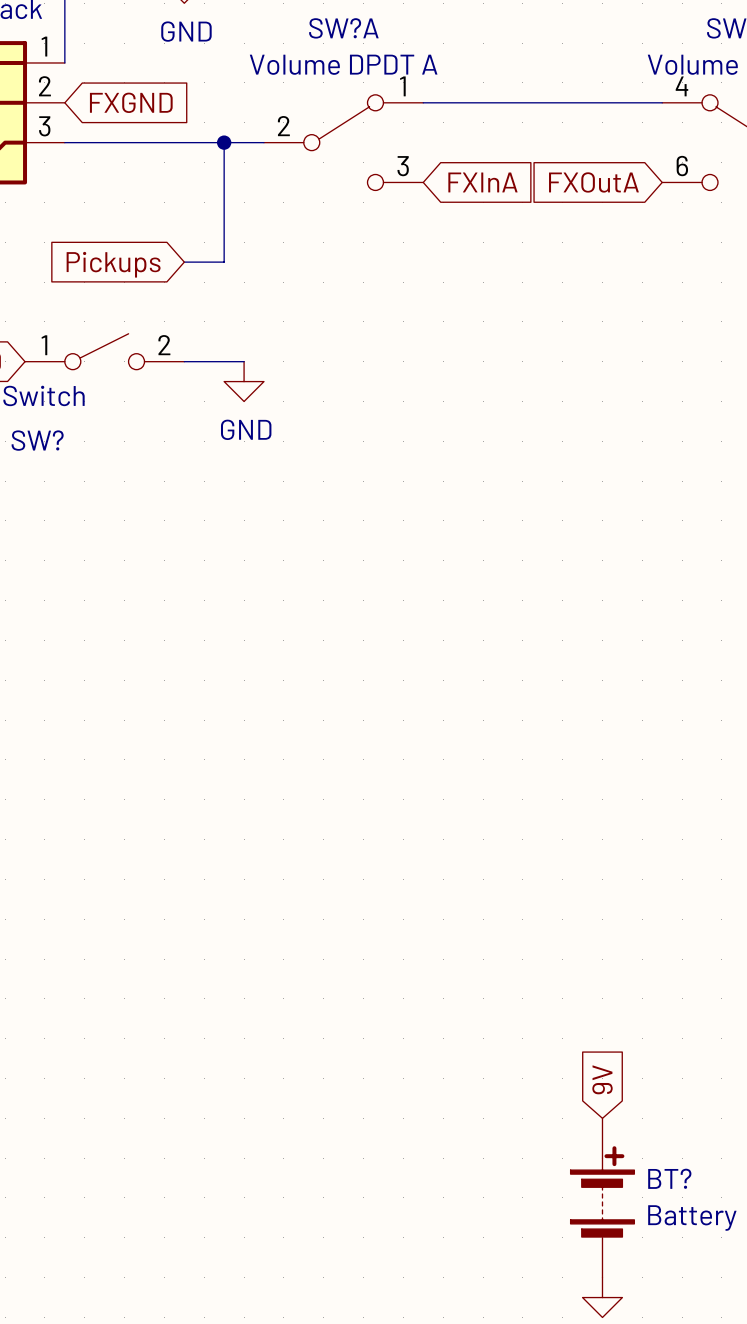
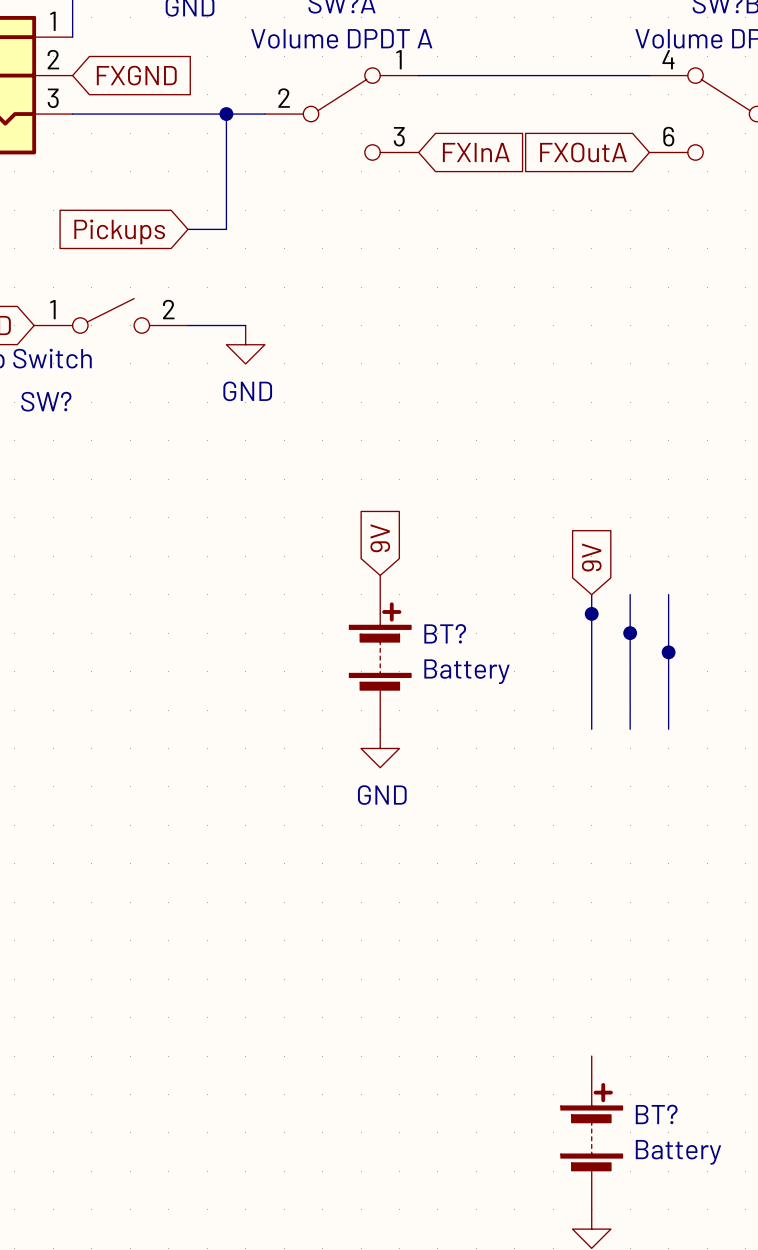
global label: none -> 9V (380, 538)
global label: none -> 9V (591, 557)
wire: none -> (591, 594) (591, 729)
wire: none -> (630, 594) (630, 729)
wire: none -> (668, 594) (668, 729)
junction: none -> (591, 613)
junction: none -> (630, 633)
BT?: none -> Battery (380, 652)
junction: none -> (668, 652)
power symbol: none -> GND (380, 748)
global label: 9V (602, 1079) -> none

